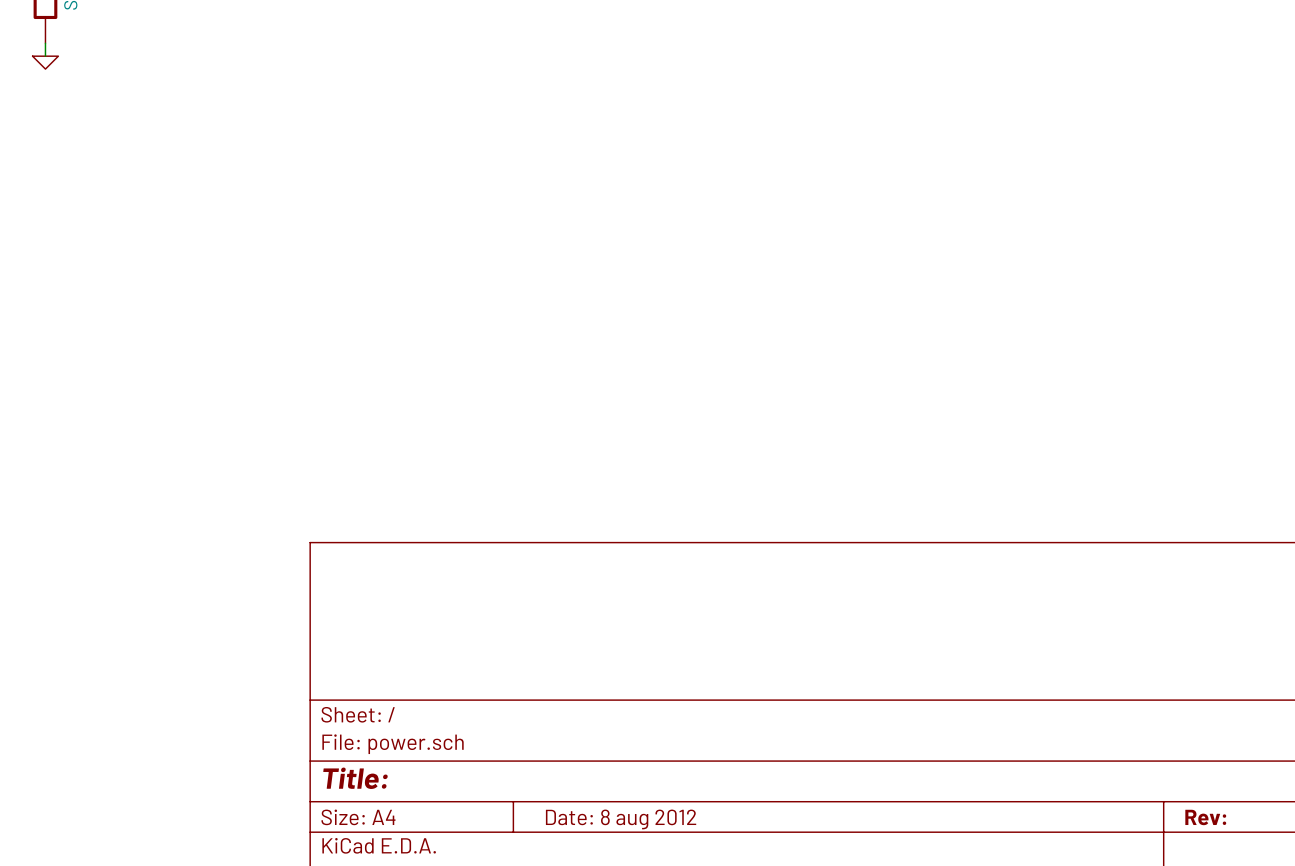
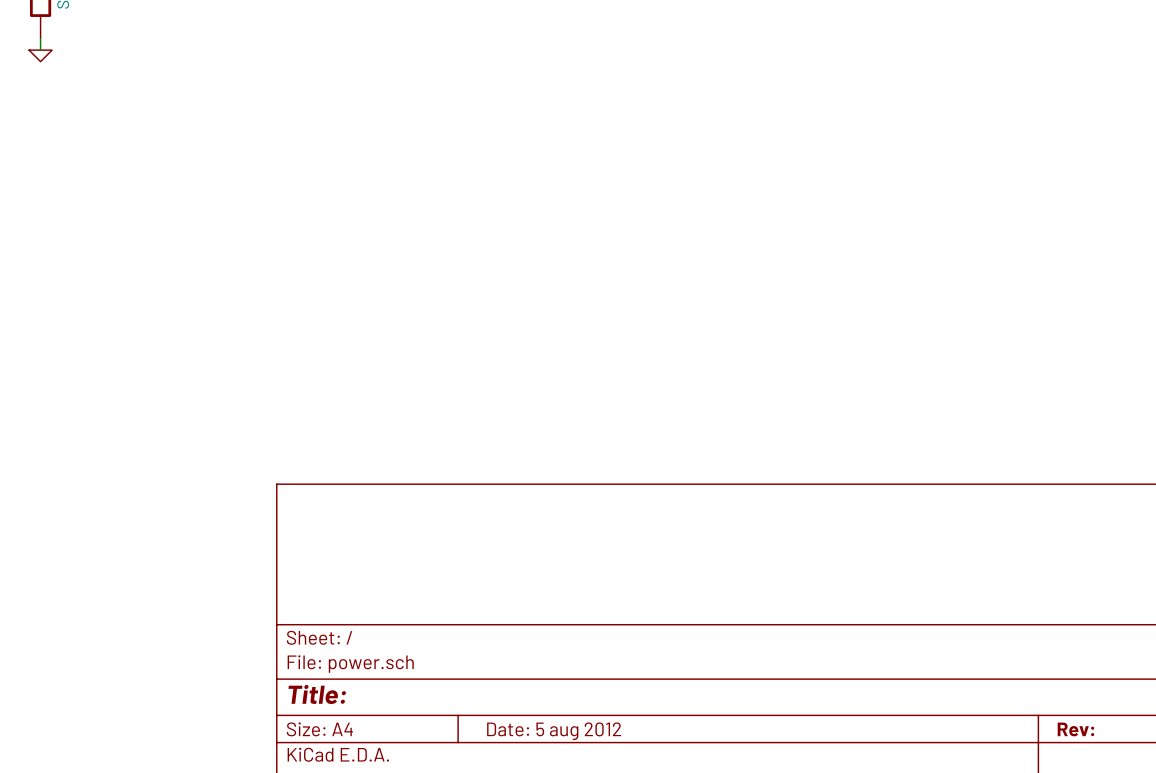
title block: Date: 8 aug 2012 (621, 819) -> Date: 5 aug 2012 (554, 731)

